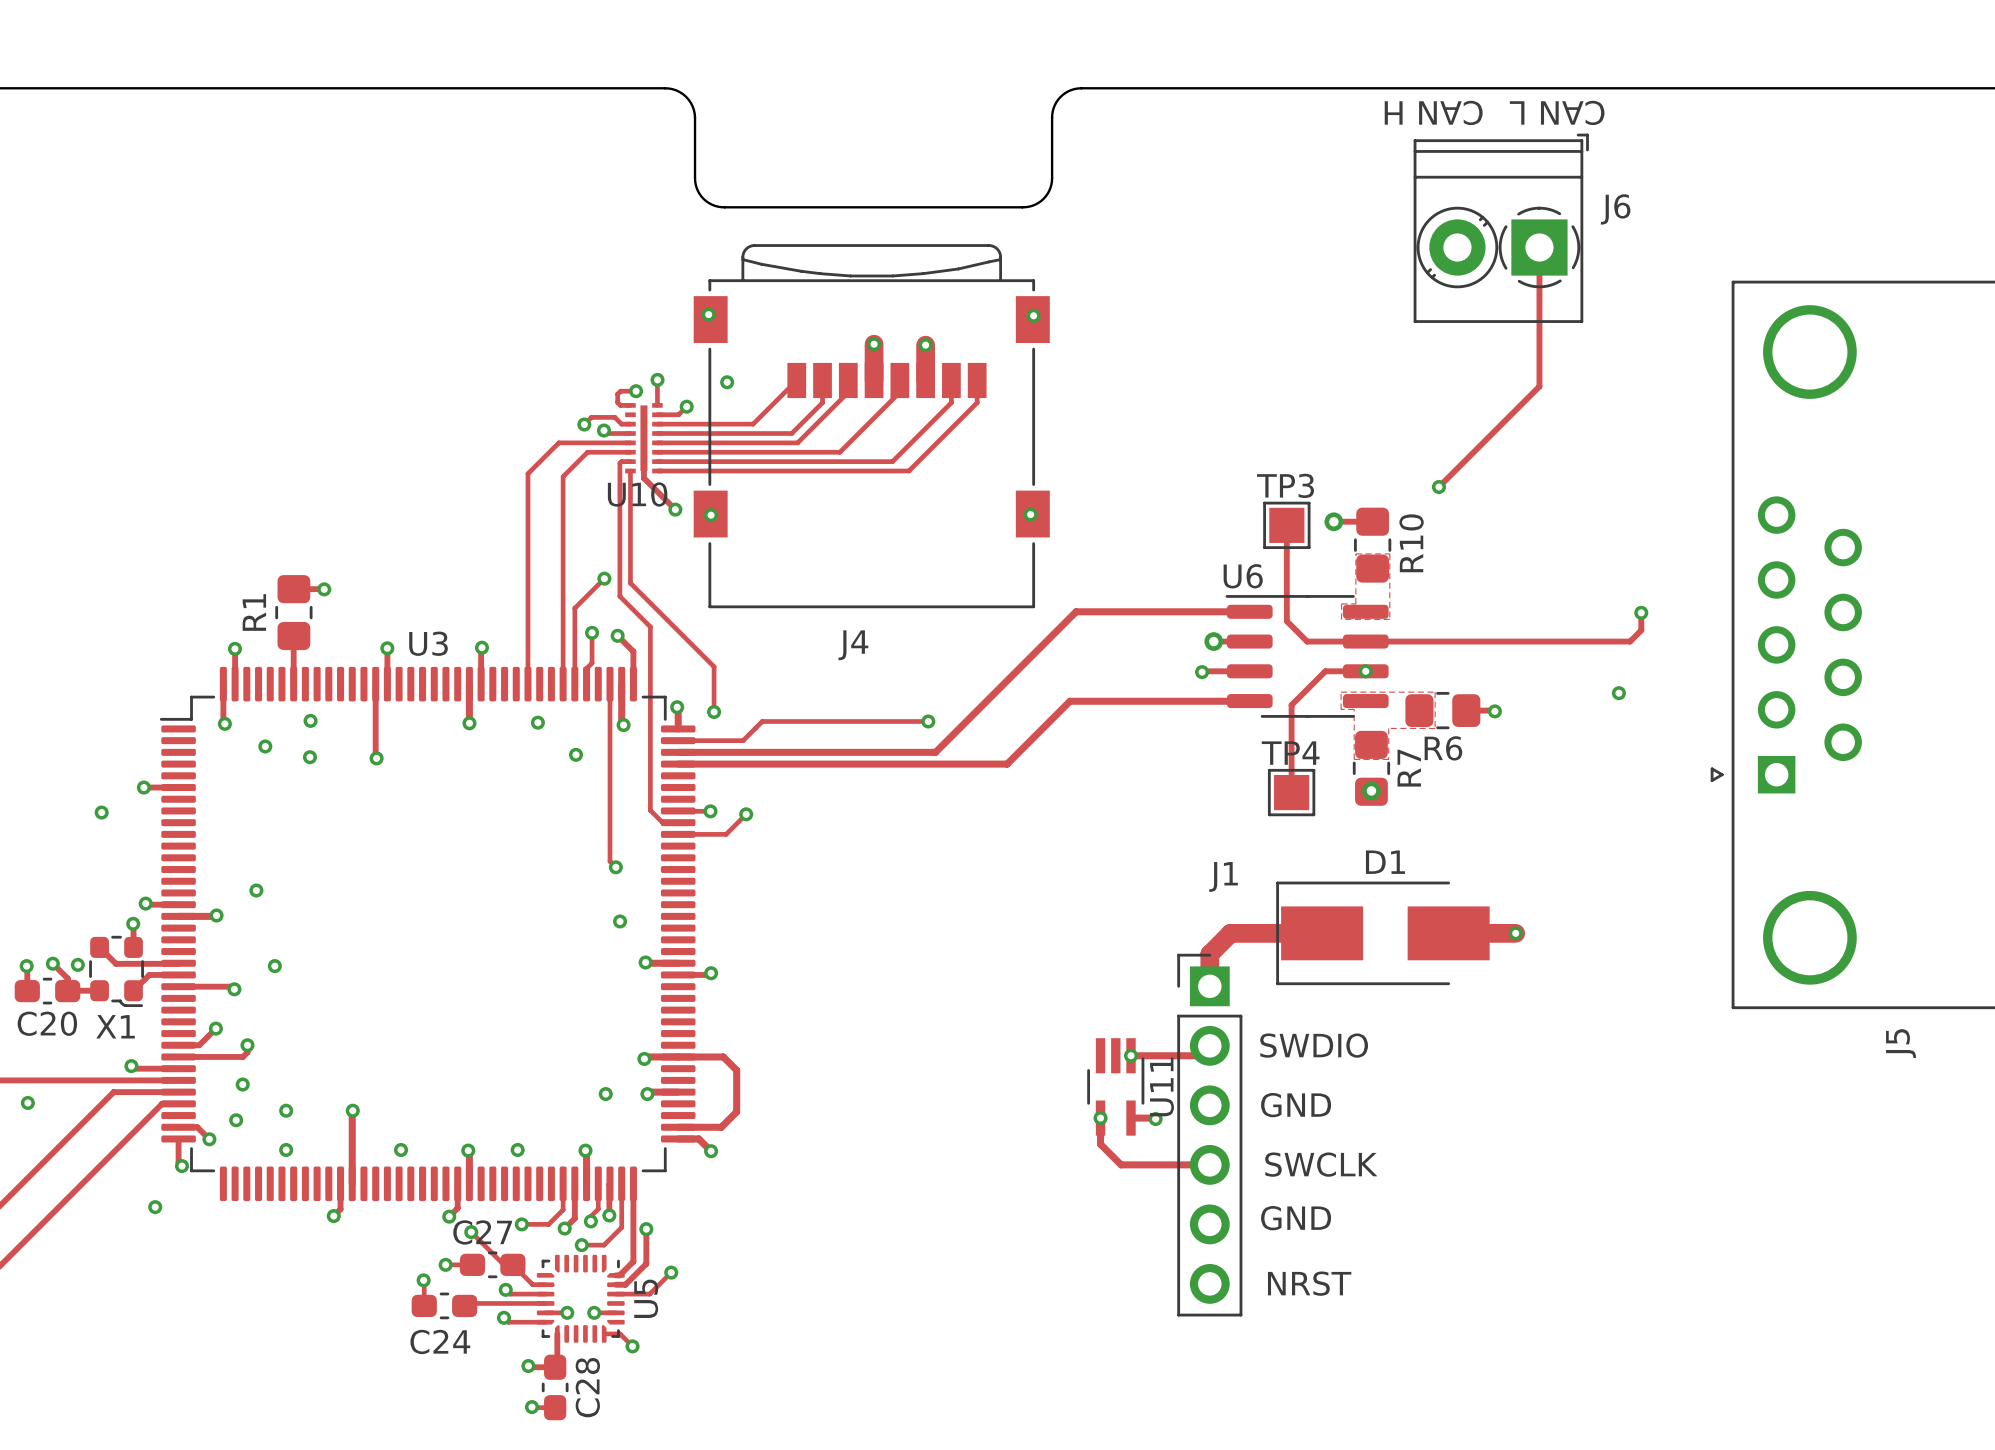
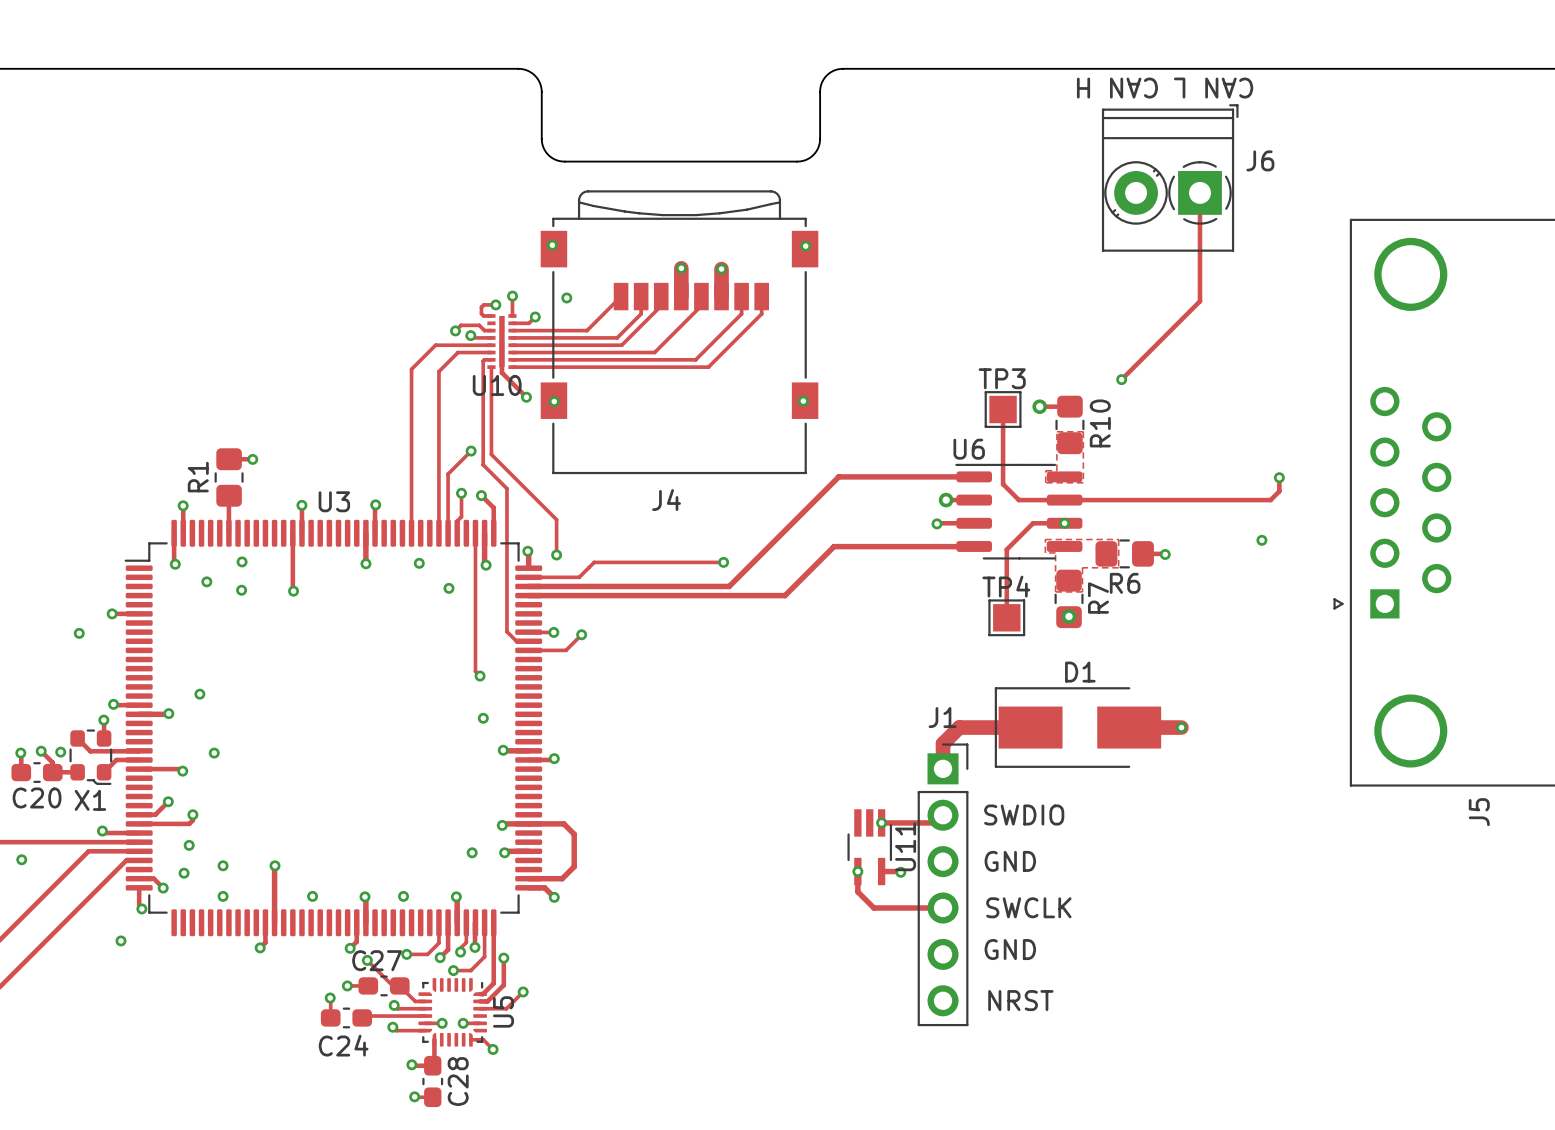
J1 name position: J1 (1223, 876) -> J1 (942, 717)
J1 footprint: [1177, 953, 1243, 1317] -> [917, 743, 969, 1027]

